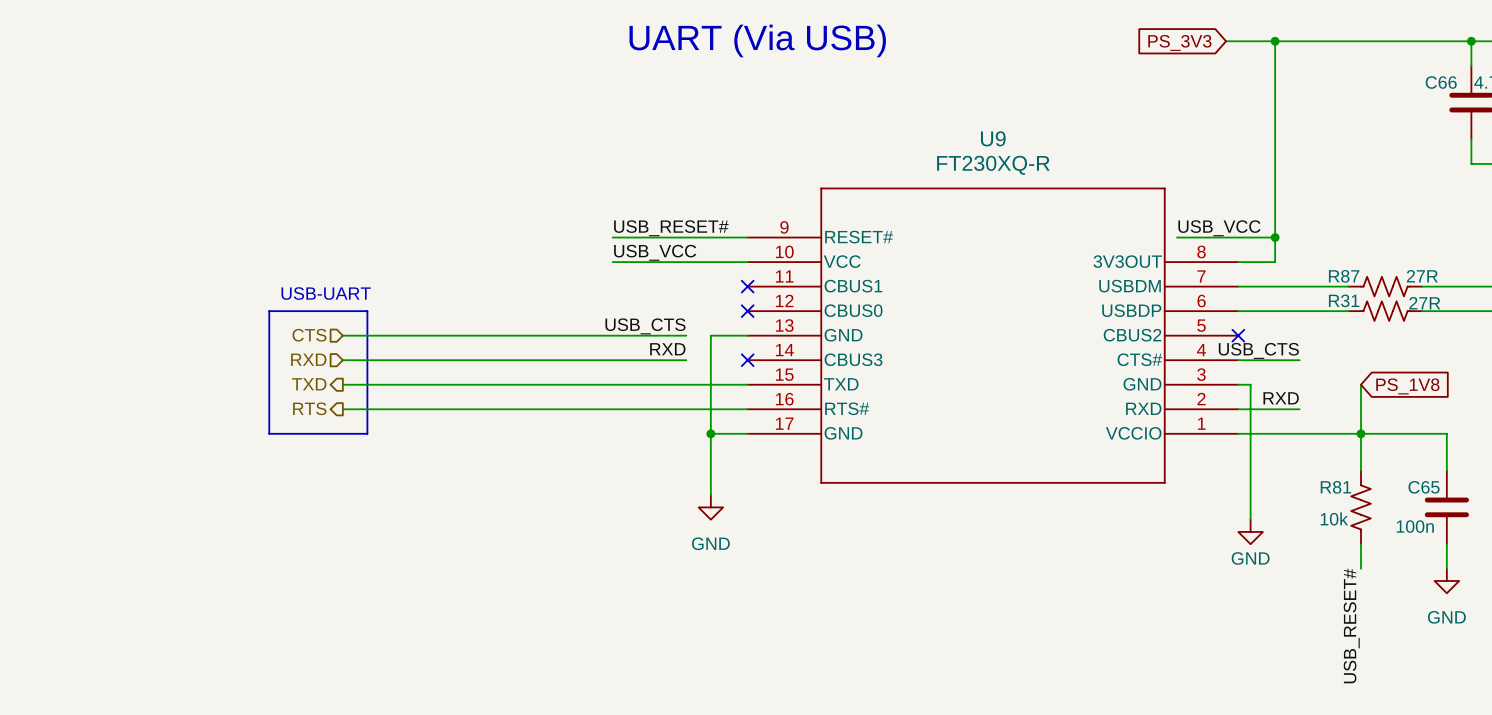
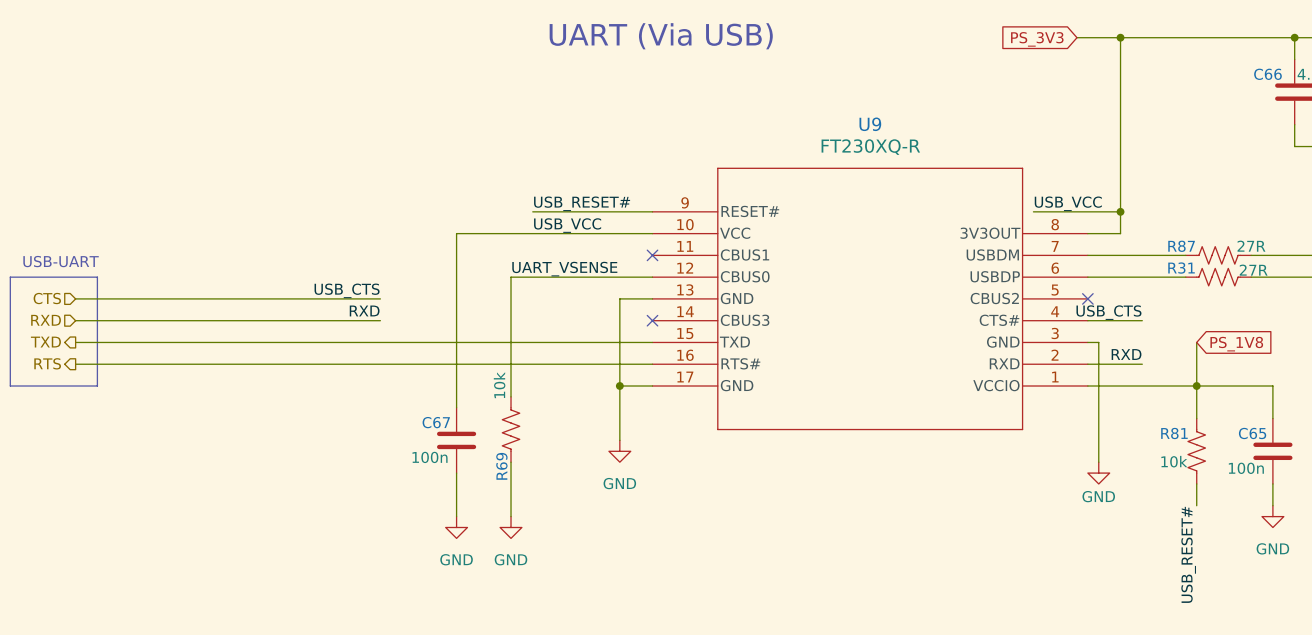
wire: none -> (532, 233) (456, 233) (456, 407)
text: none -> USB-UART (61, 261)
text: USB-UART (326, 293) -> none
label: none -> UART_VSENSE (564, 269)
line: none -> (10, 277) (97, 277) (97, 386) (10, 386) (10, 277)
line: (269, 311) (367, 311) (367, 433) (269, 433) (269, 311) -> none
wire: none -> (652, 277) (511, 277) (511, 396)
no-connect mark: (747, 311) -> none
label: none -> USB_CTS (347, 290)
label: USB_CTS (645, 326) -> none
hierarchical label: none -> CTS (47, 298)
wire: none -> (75, 298) (293, 298)
hierarchical label: CTS (309, 335) -> none
wire: (441, 335) (686, 335) -> none
label: none -> RXD (364, 310)
label: RXD (667, 349) -> none
hierarchical label: none -> RXD (46, 320)
hierarchical label: RXD (308, 359) -> none
wire: none -> (75, 320) (293, 320)
wire: (441, 360) (686, 360) -> none
hierarchical label: none -> TXD (45, 342)
wire: none -> (75, 342) (293, 342)
hierarchical label: TXD (309, 384) -> none
hierarchical label: none -> RTS (47, 363)
hierarchical label: RTS (309, 408) -> none
wire: none -> (75, 364) (293, 364)
R69: none -> 10k (511, 429)
C67: none -> 100n (456, 440)
wire: none -> (511, 462) (511, 516)
wire: none -> (456, 473) (456, 516)
power symbol: none -> GND (456, 527)
power symbol: none -> GND (511, 527)

